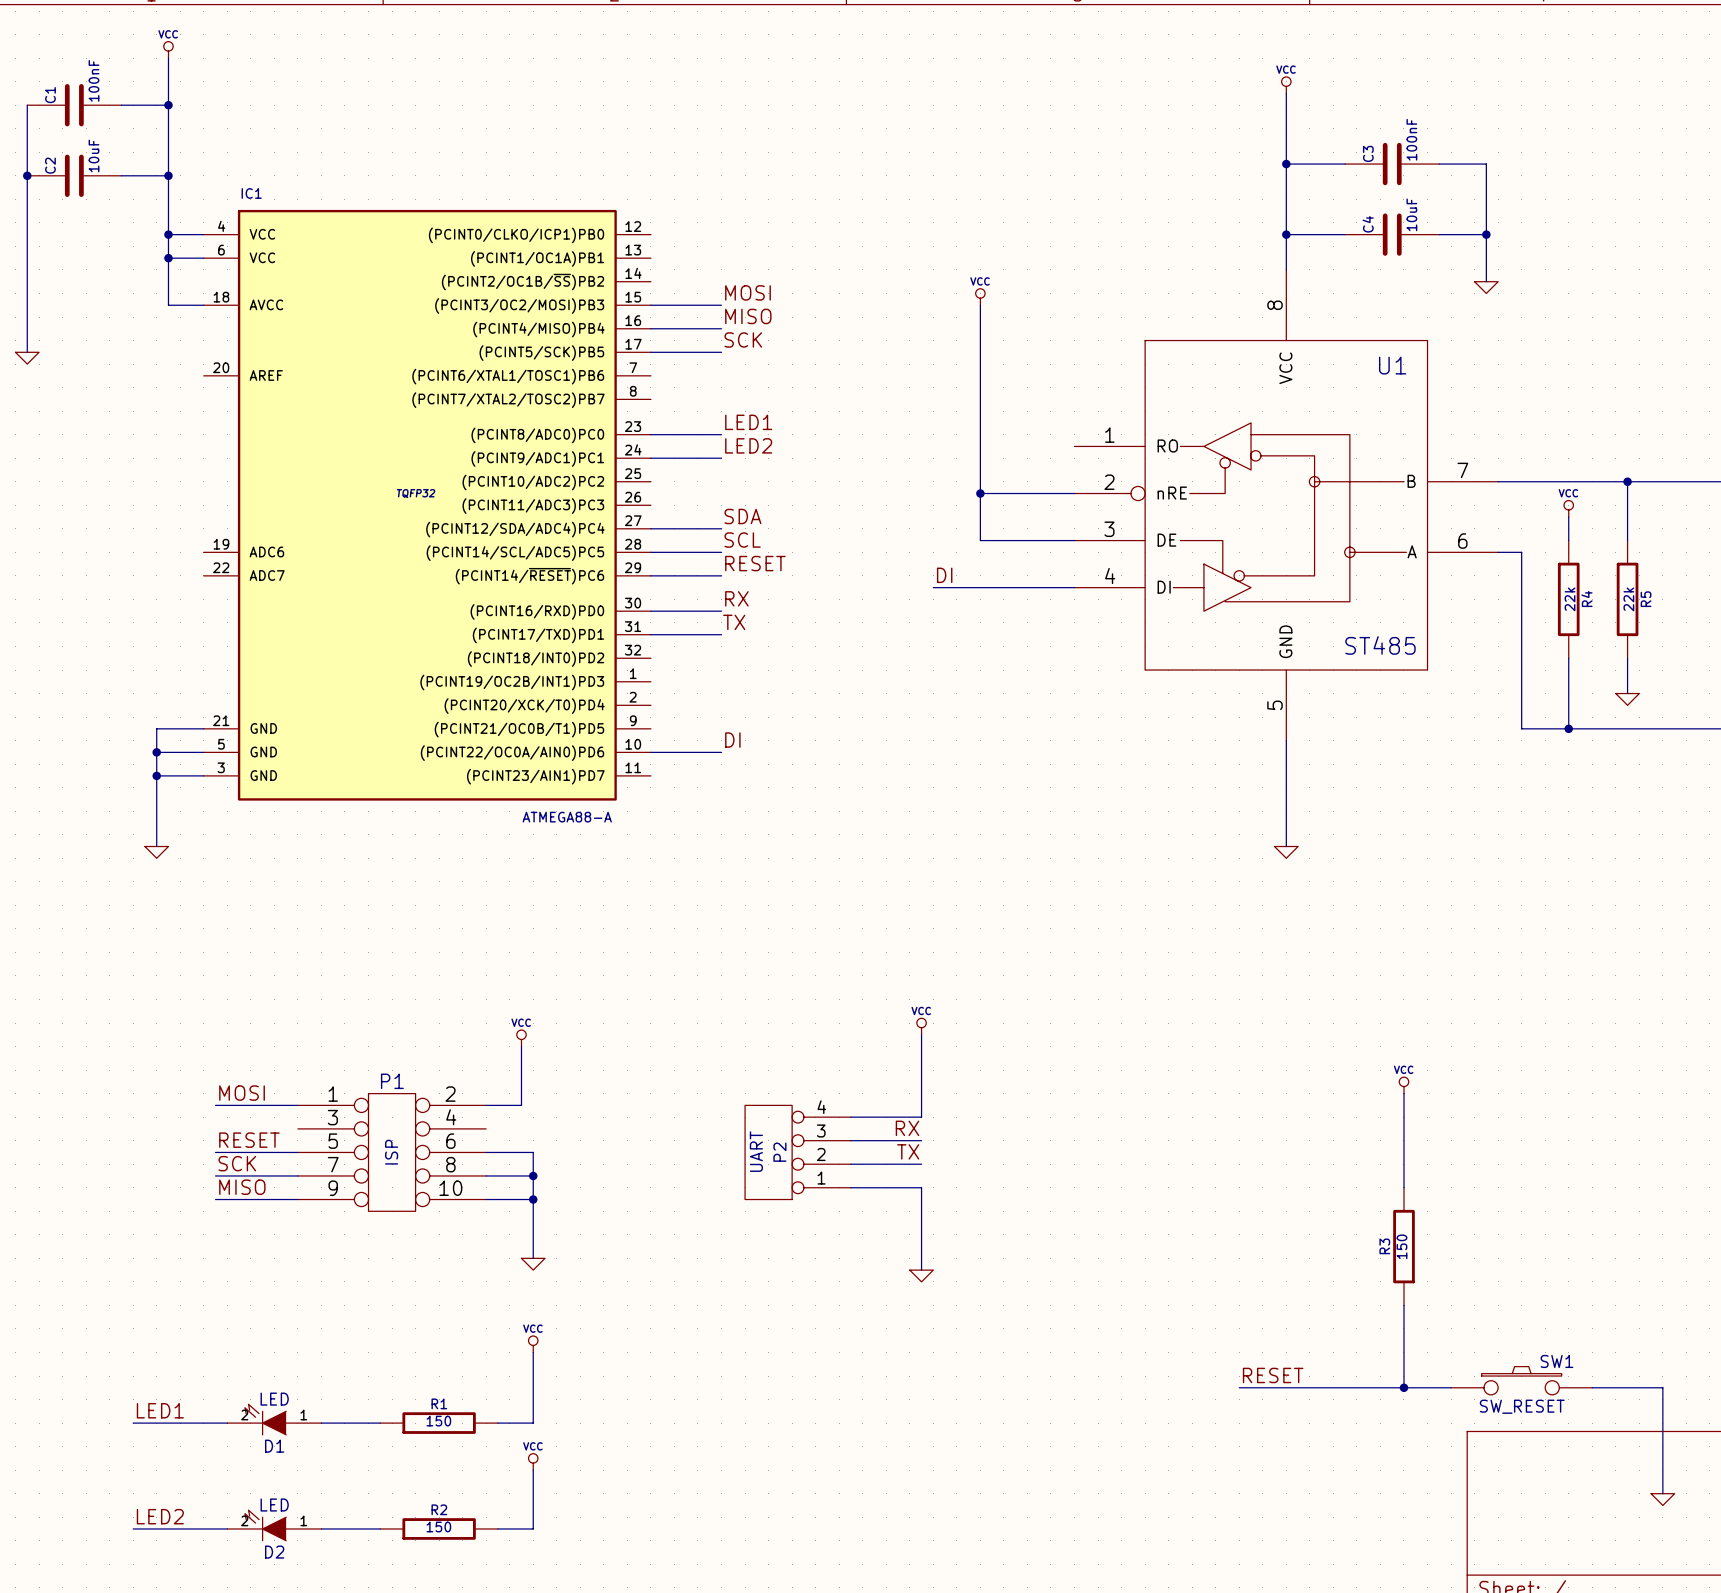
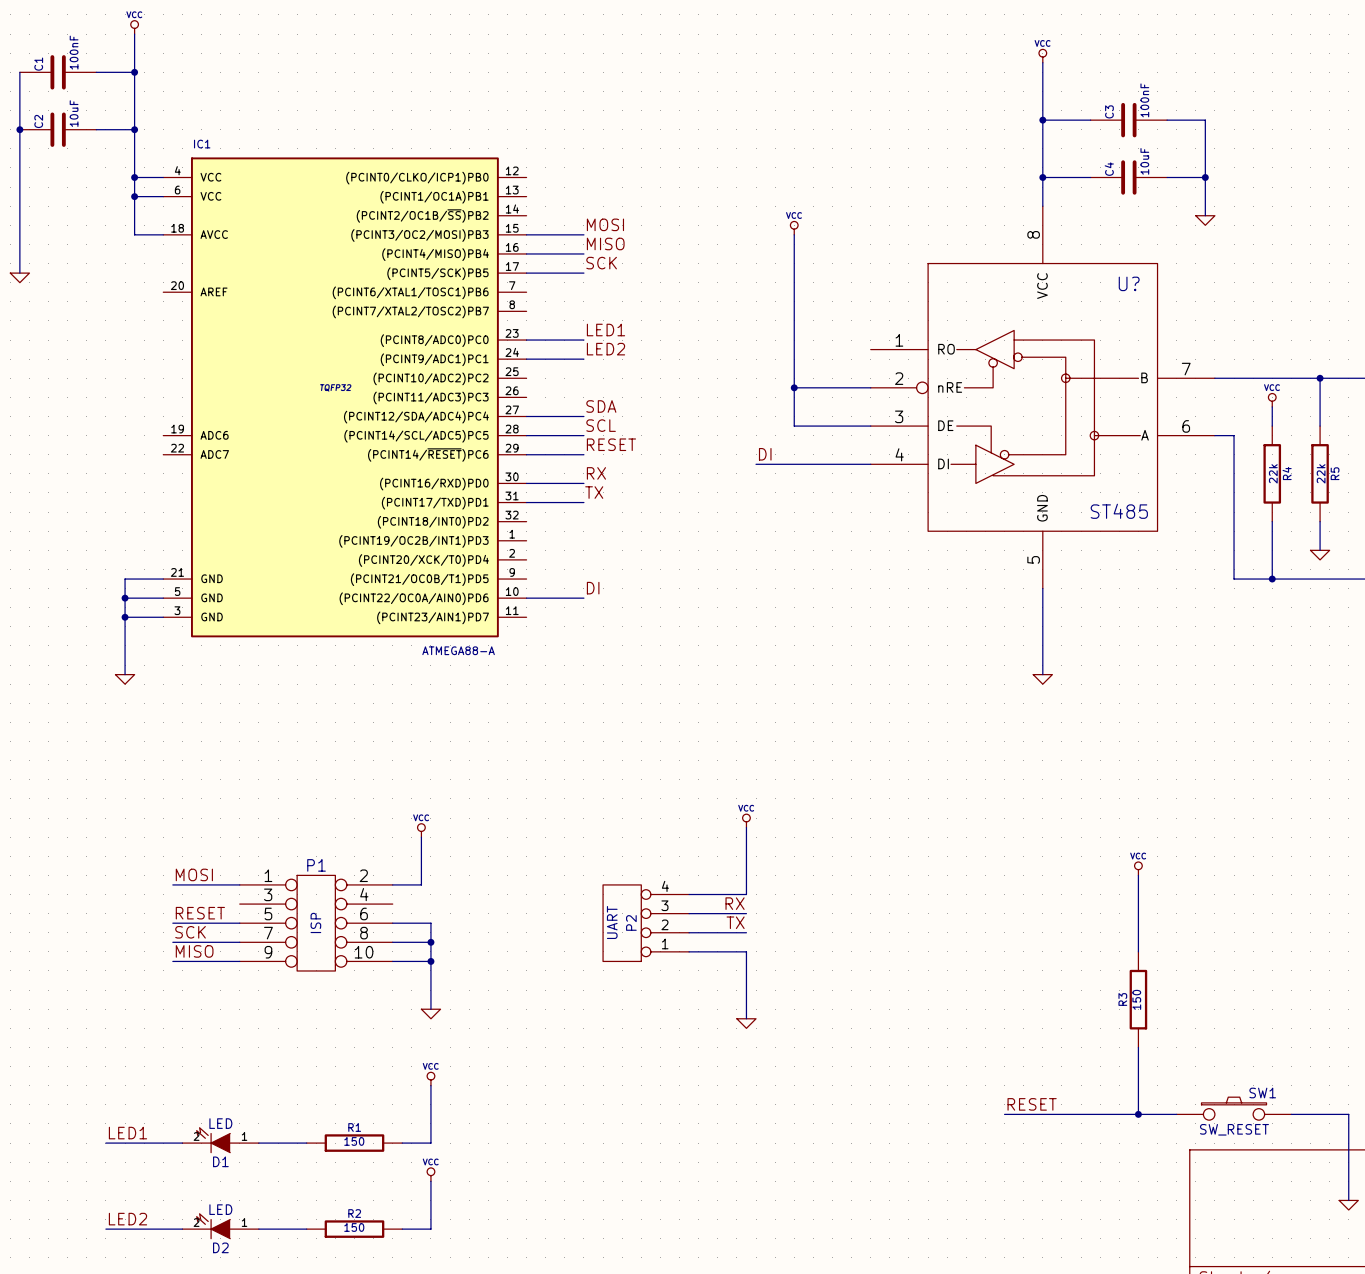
U1 name: U1 (1392, 365) -> U? (1129, 283)

